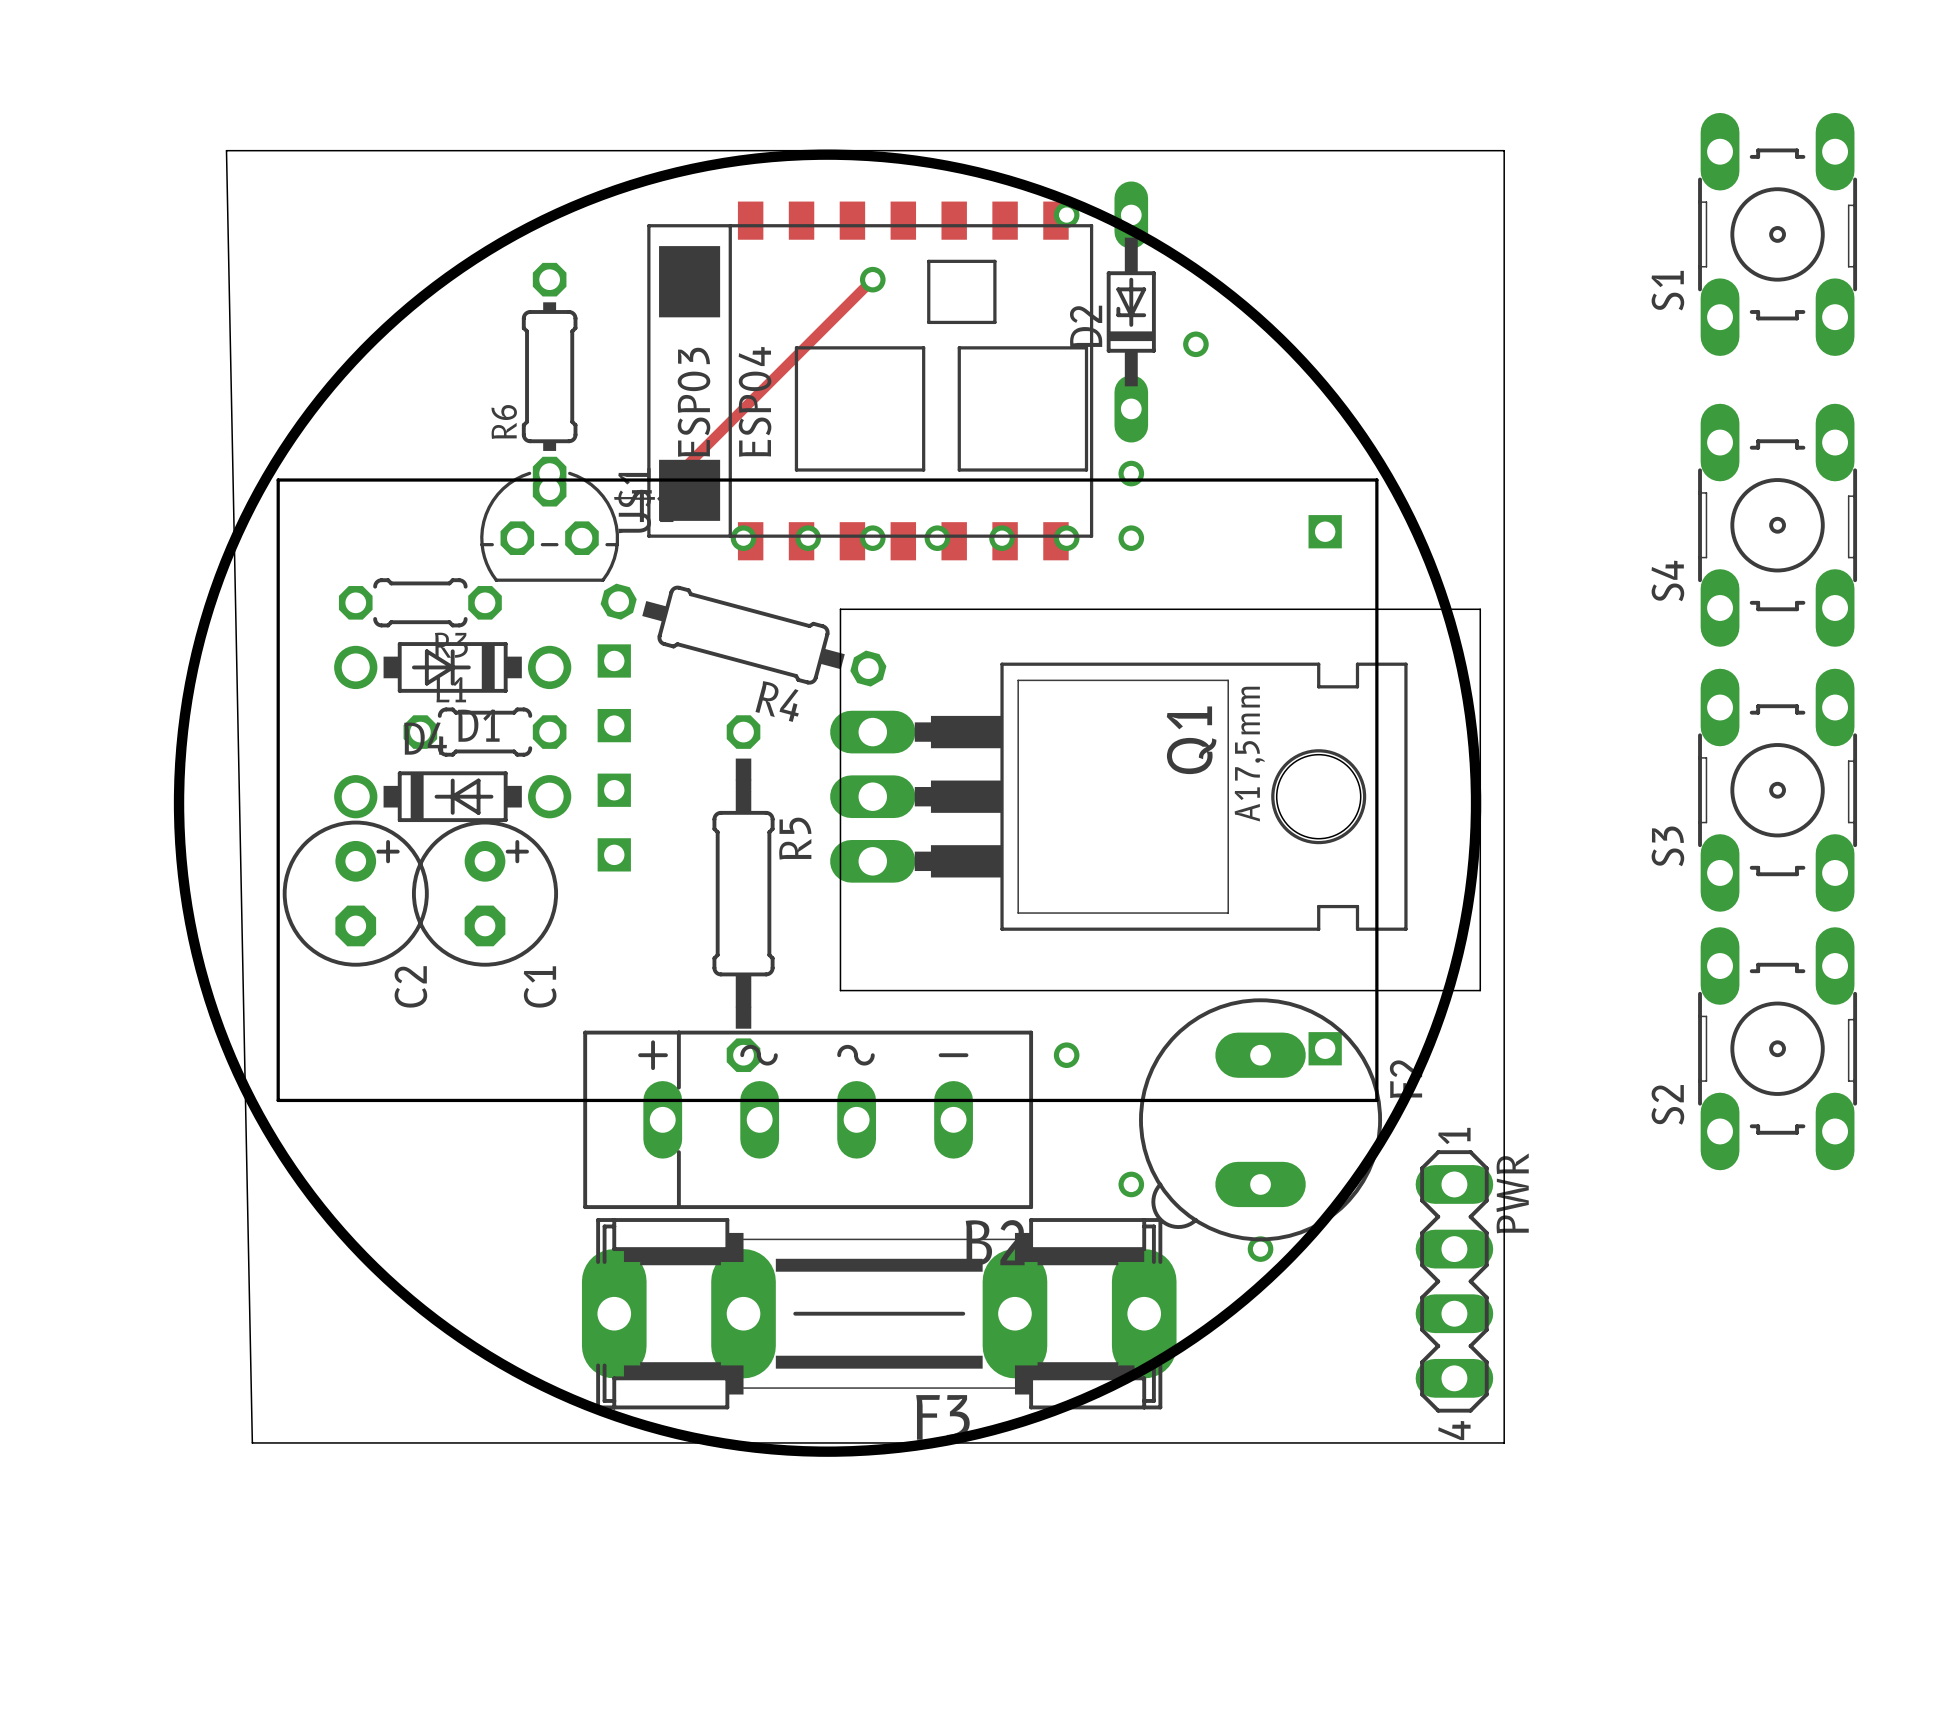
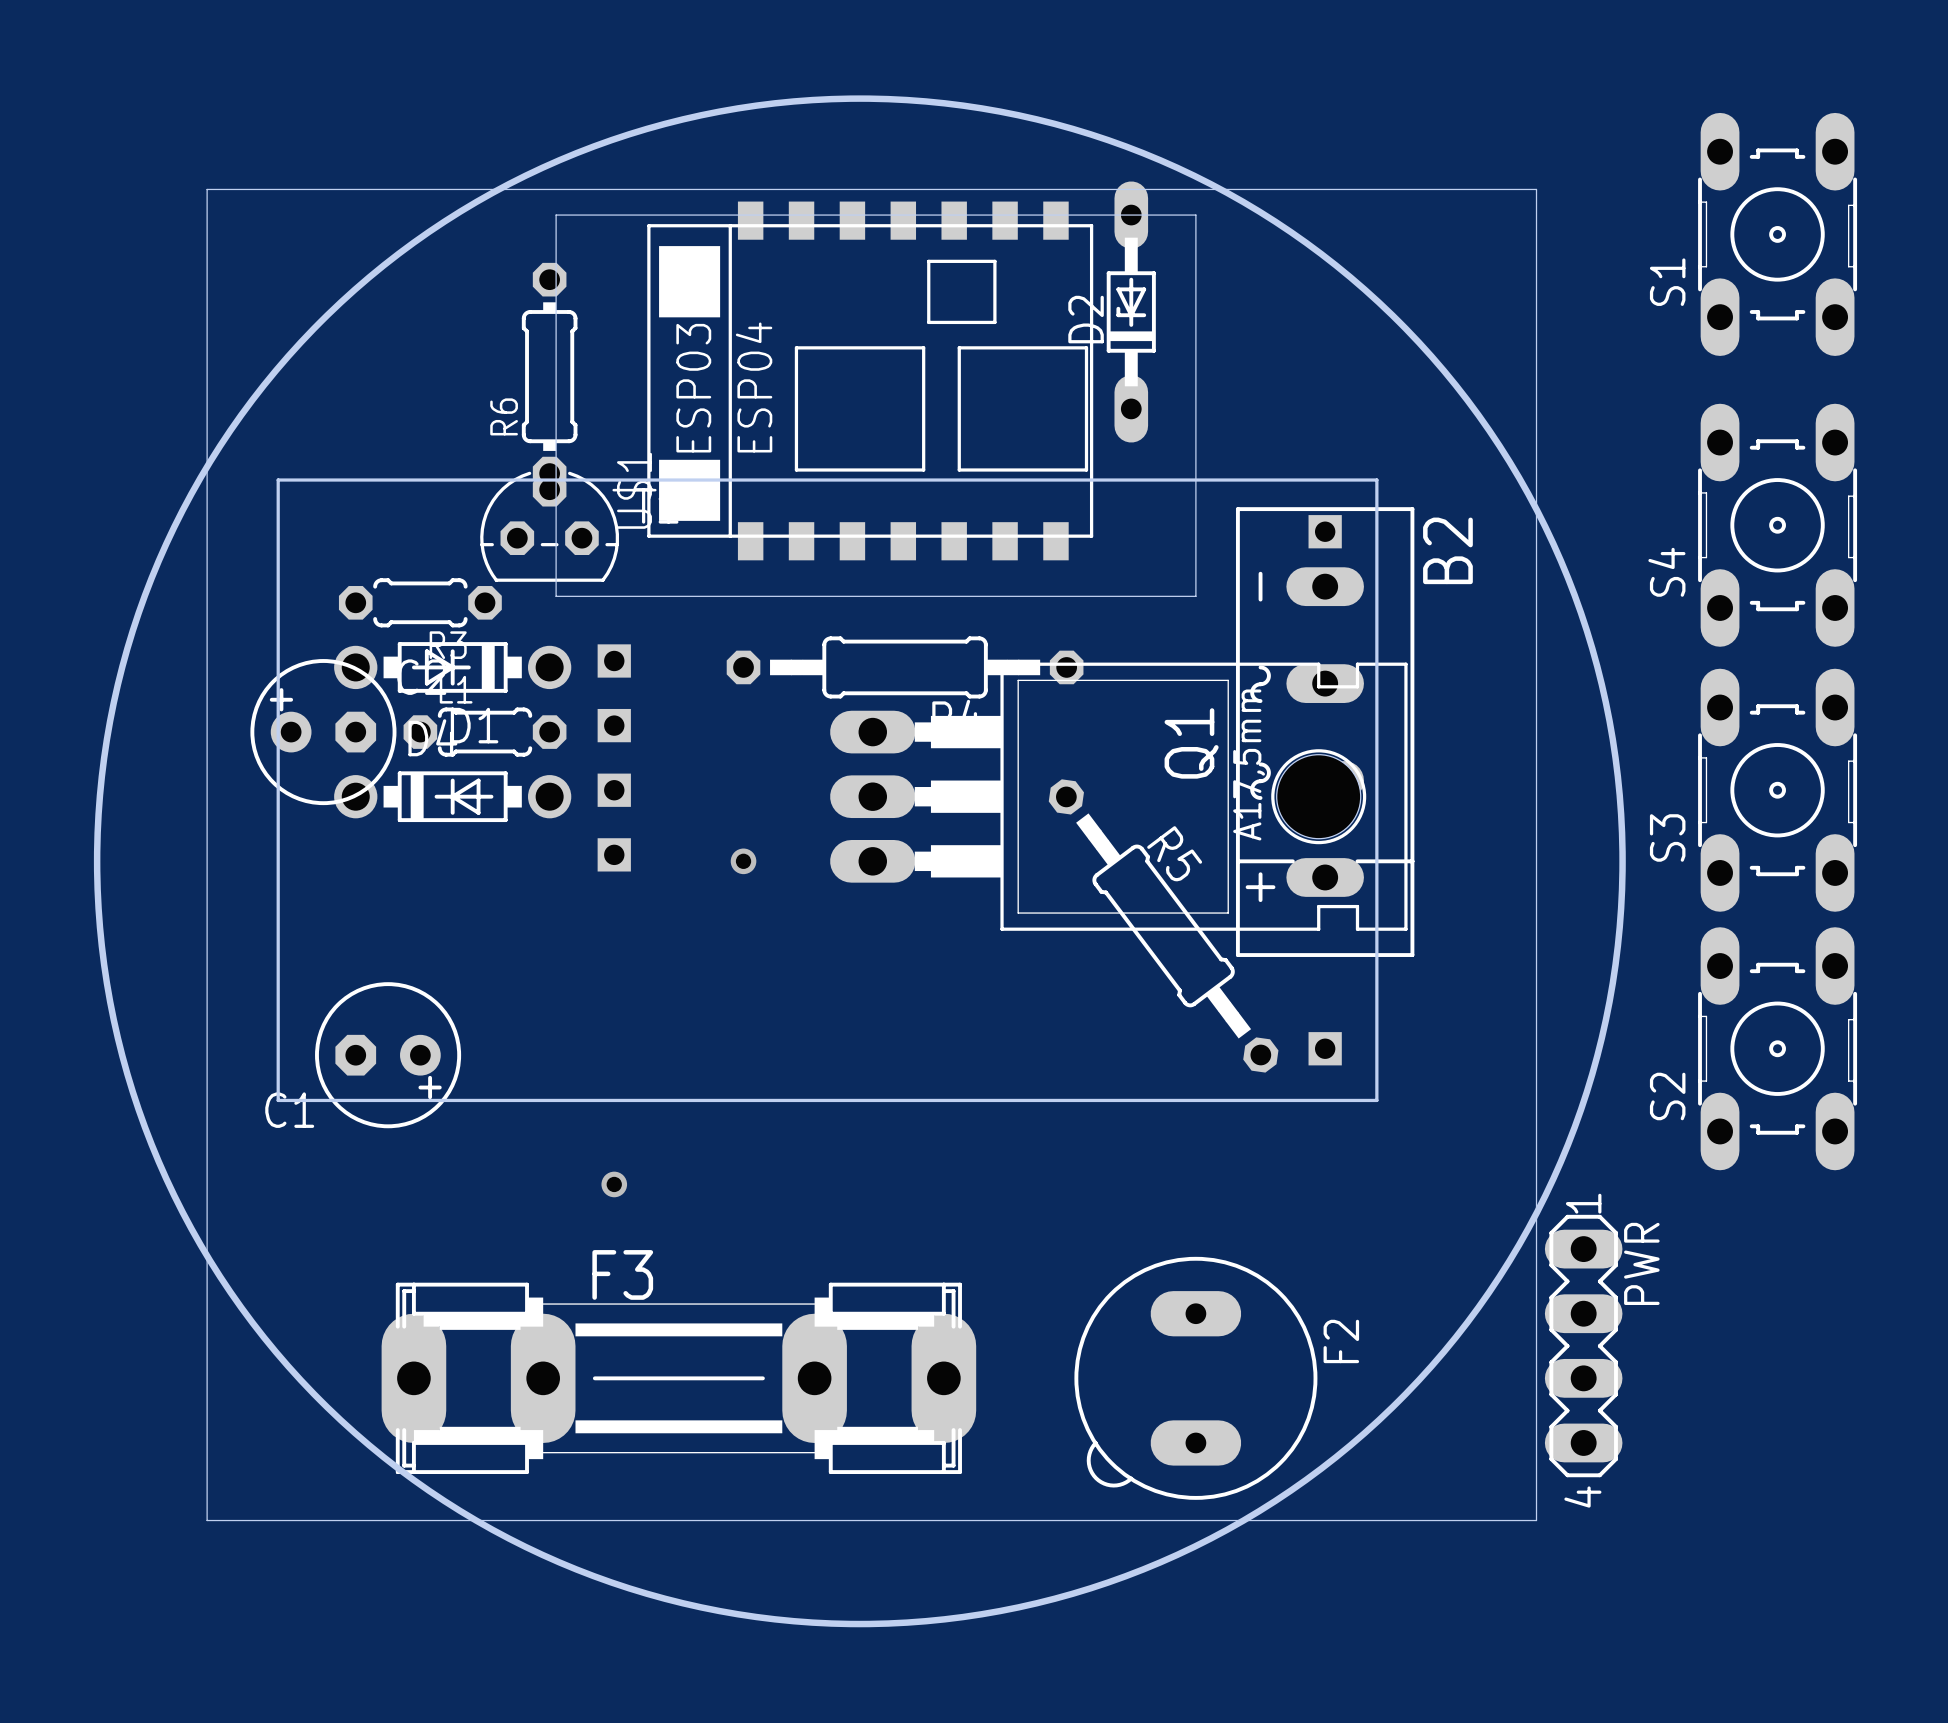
round board edge: none -> [93, 95, 1626, 1628]
round board edge: [173, 149, 1482, 1457] -> none
board edge: (226, 150) (1504, 150) (1504, 1442) (252, 1442) (226, 150) -> (207, 189) (207, 1520) (1536, 1520) (1536, 189) (207, 189)
via: (1066, 215) -> none
track: (872, 279) (678, 473) -> none
via: (872, 279) -> none
via: (1195, 344) -> none
via: (1131, 473) -> none
via: (743, 538) -> none
via: (808, 538) -> none
via: (872, 538) -> none
via: (937, 538) -> none
via: (1002, 538) -> none
via: (1066, 538) -> none
via: (1131, 538) -> none
R4 footprint: [600, 583, 887, 687] -> [726, 636, 1084, 699]
board edge: (840, 609) (1480, 609) (1480, 990) (840, 990) (840, 609) -> (556, 215) (1195, 215) (1195, 596) (556, 596) (556, 215)
via: none -> (743, 861)
C2 rotation: 0° (355, 893) -> 90° counterclockwise (323, 732)
C2 position: (355, 893) -> (323, 732)
C1 rotation: 0° (485, 893) -> 90° clockwise (388, 1055)
C1 position: (485, 893) -> (388, 1055)
R5 rotation: 0° (743, 893) -> 37° counterclockwise (1163, 925)
R5 position: (743, 893) -> (1163, 925)
via: (1066, 1055) -> none
B2 rotation: 0° (808, 1119) -> 90° counterclockwise (1325, 732)
B2 position: (808, 1119) -> (1325, 732)
F2 position: (1260, 1119) -> (1195, 1378)
via: none -> (614, 1184)
via: (1131, 1184) -> none
via: (1260, 1249) -> none
PWR position: (1454, 1281) -> (1583, 1346)
F3 rotation: 0° (879, 1313) -> 180° (678, 1378)

